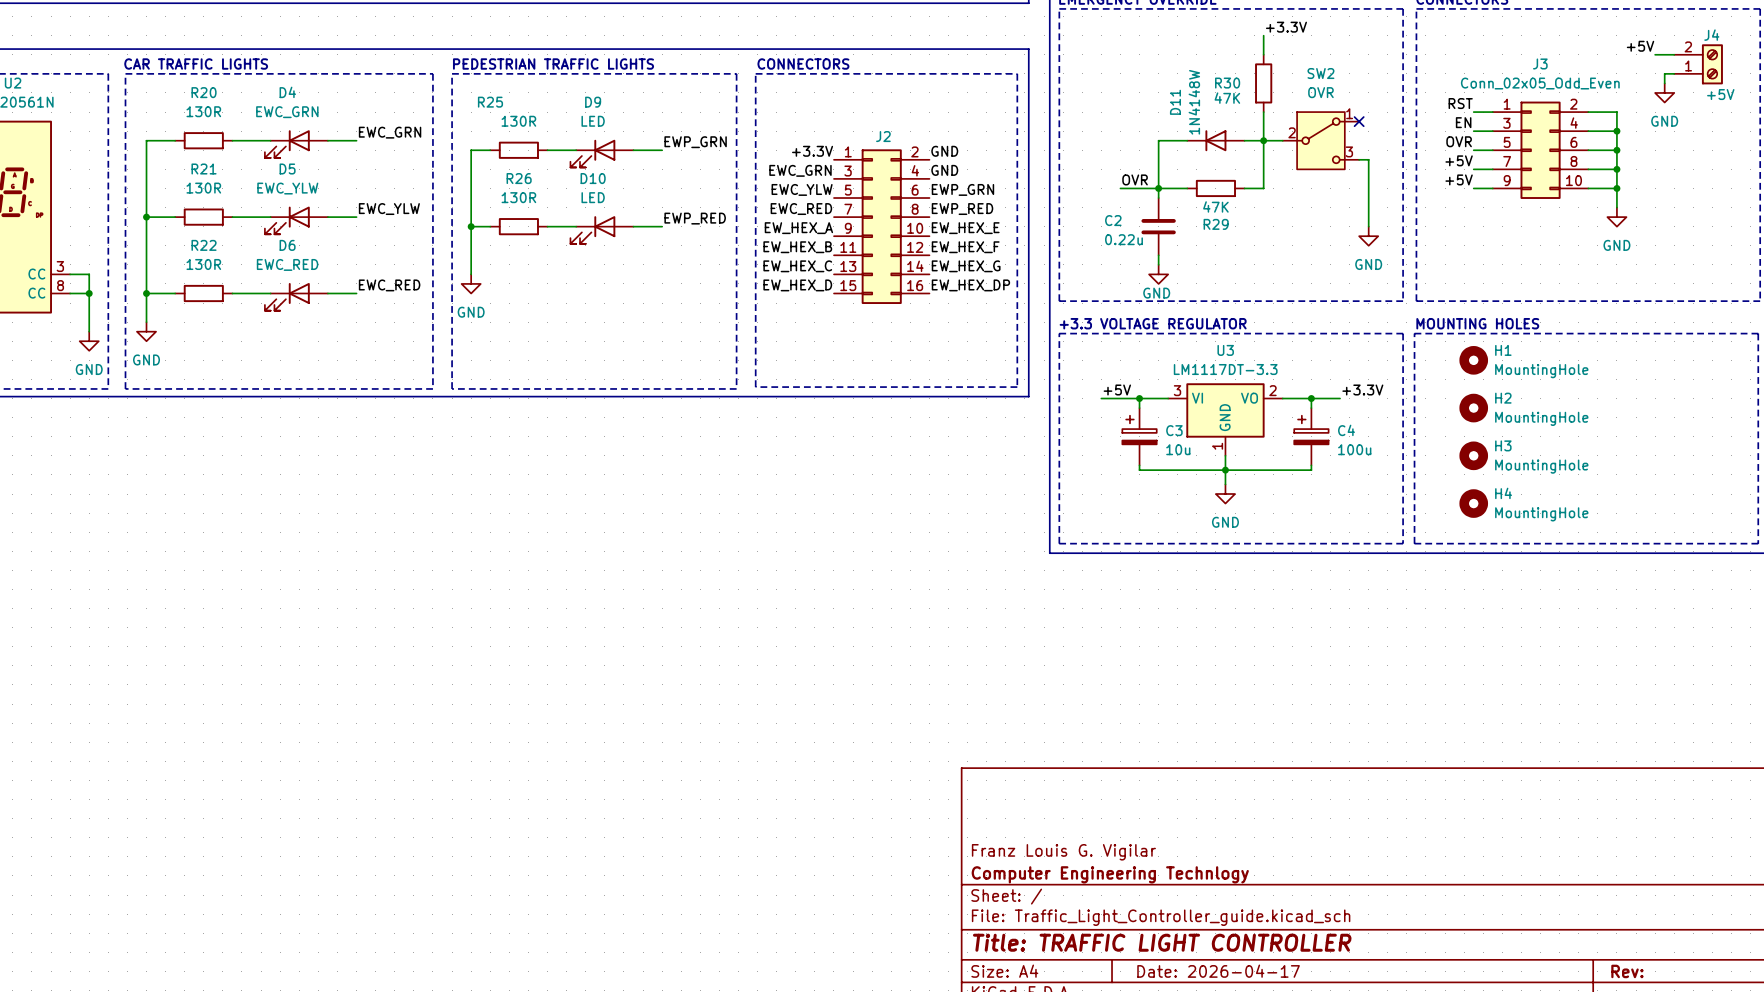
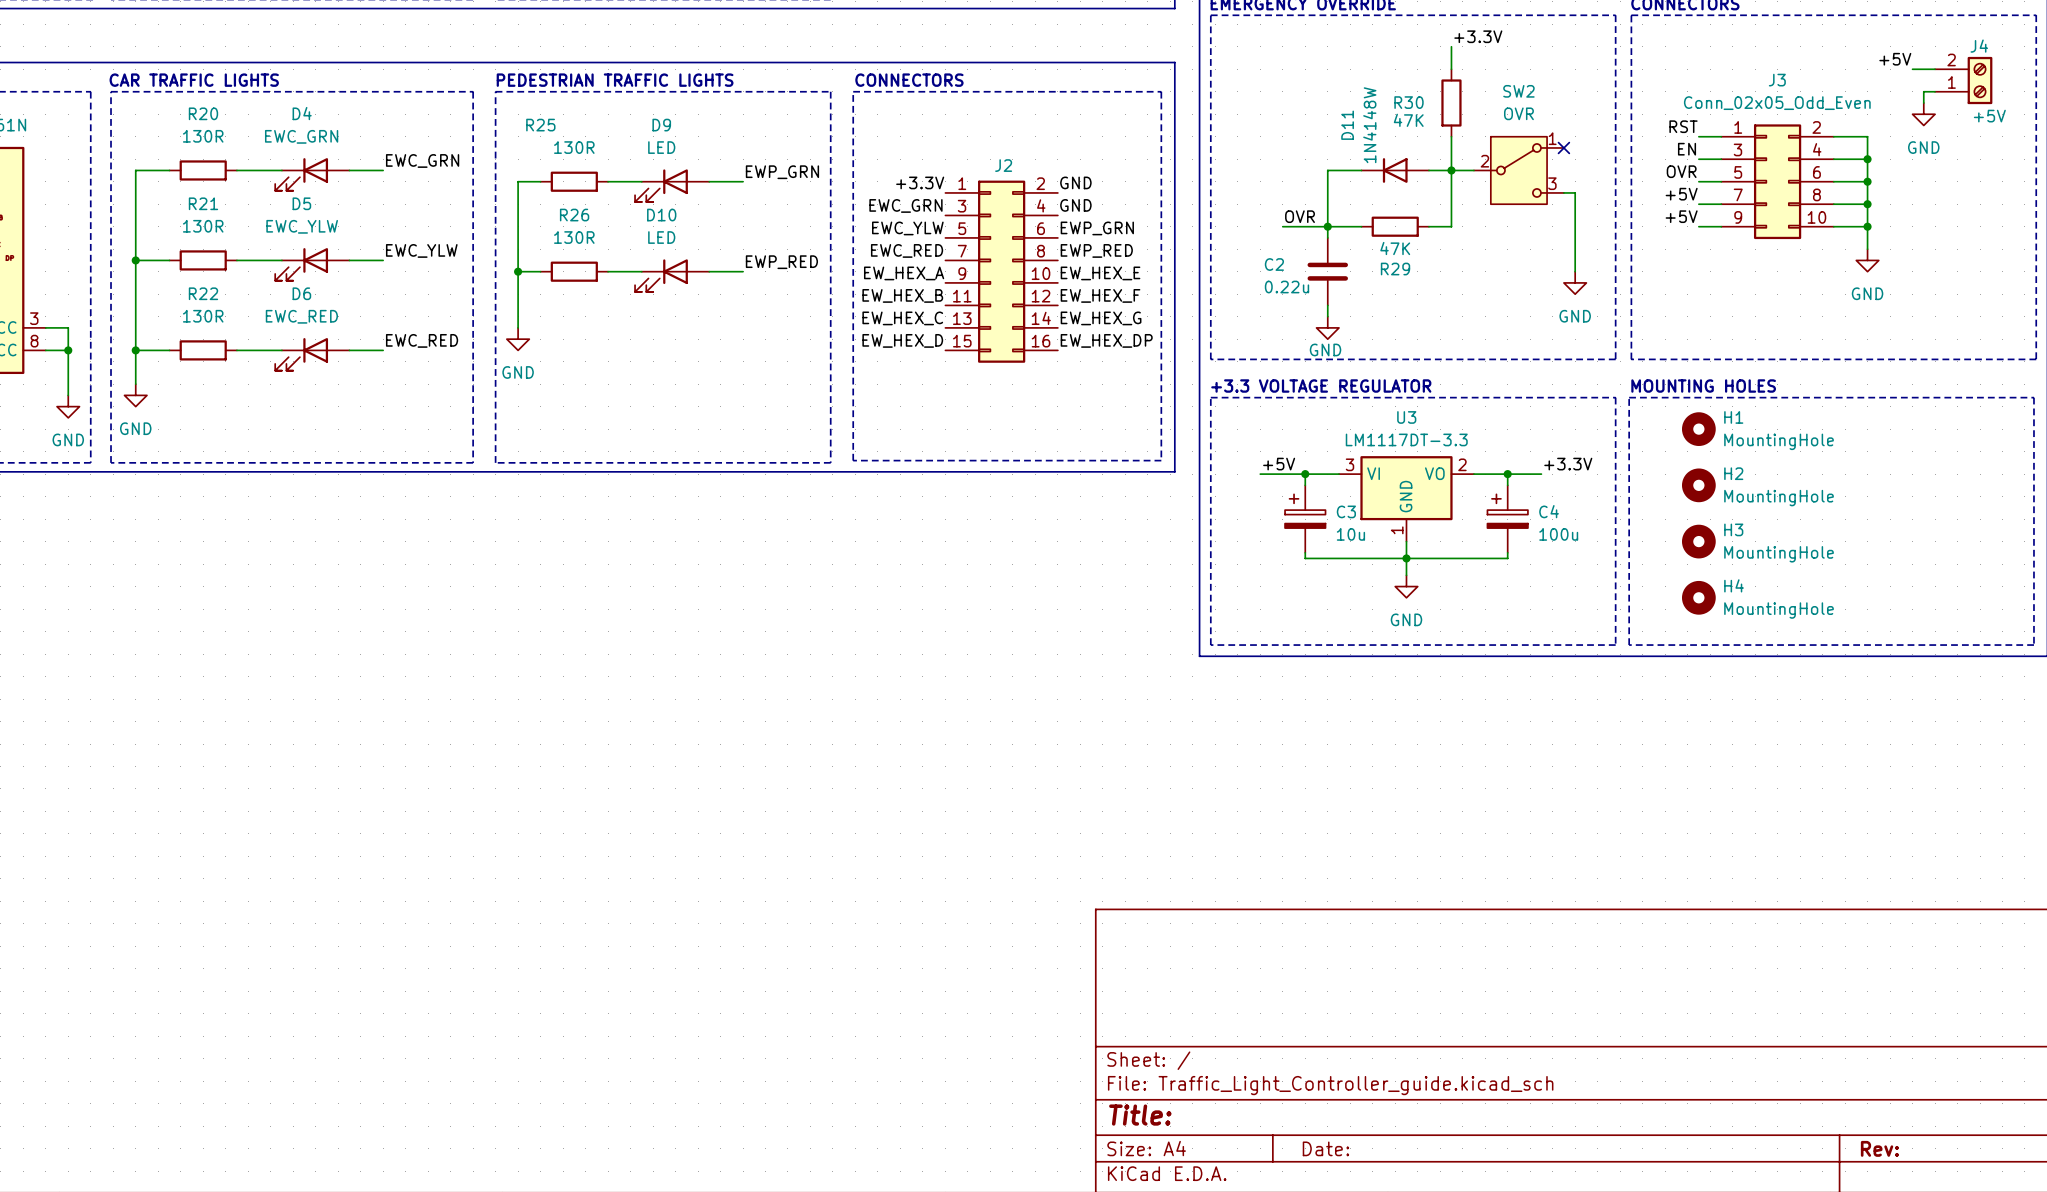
title block: Franz Louis G. Vigilar (1063, 852) -> none
title block: Computer Engineering Technlogy (1110, 874) -> none
title block: Title: TRAFFIC LIGHT CONTROLLER (1162, 942) -> Title: (1140, 1115)
title block: Date: 2026-04-17 (1218, 971) -> Date: (1325, 1148)

